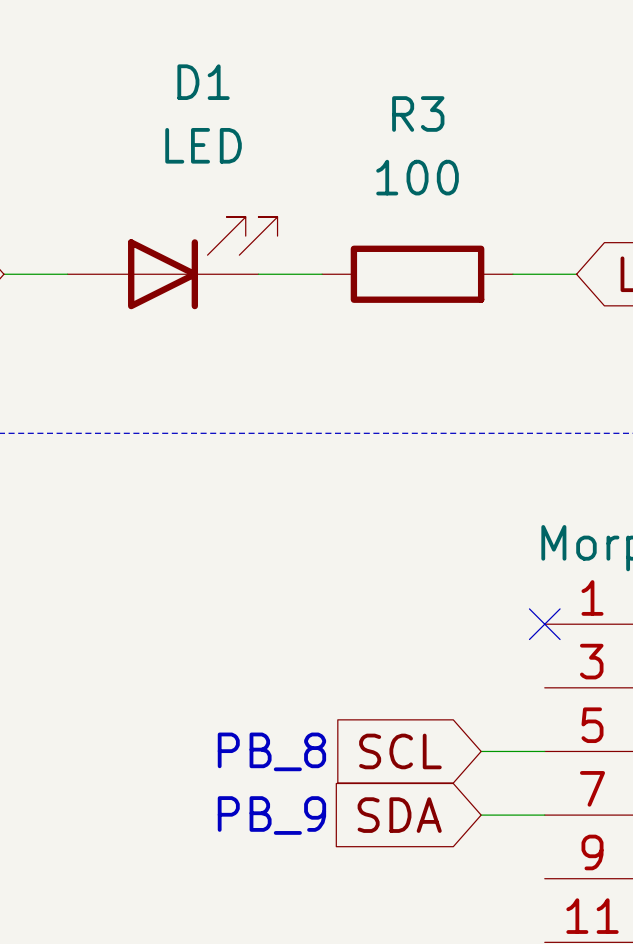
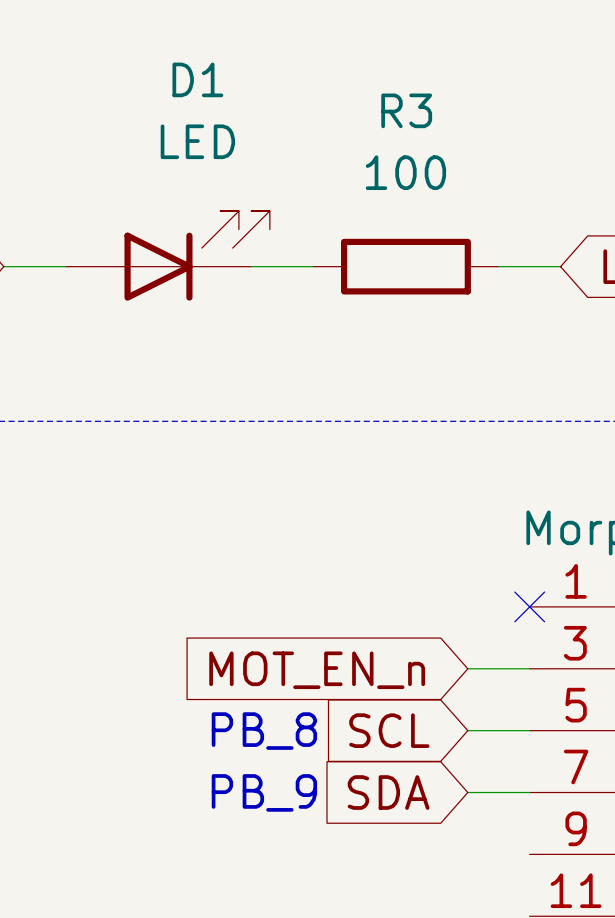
wire: none -> (467, 668) (529, 668)
global label: none -> MOT_EN_n (317, 670)

